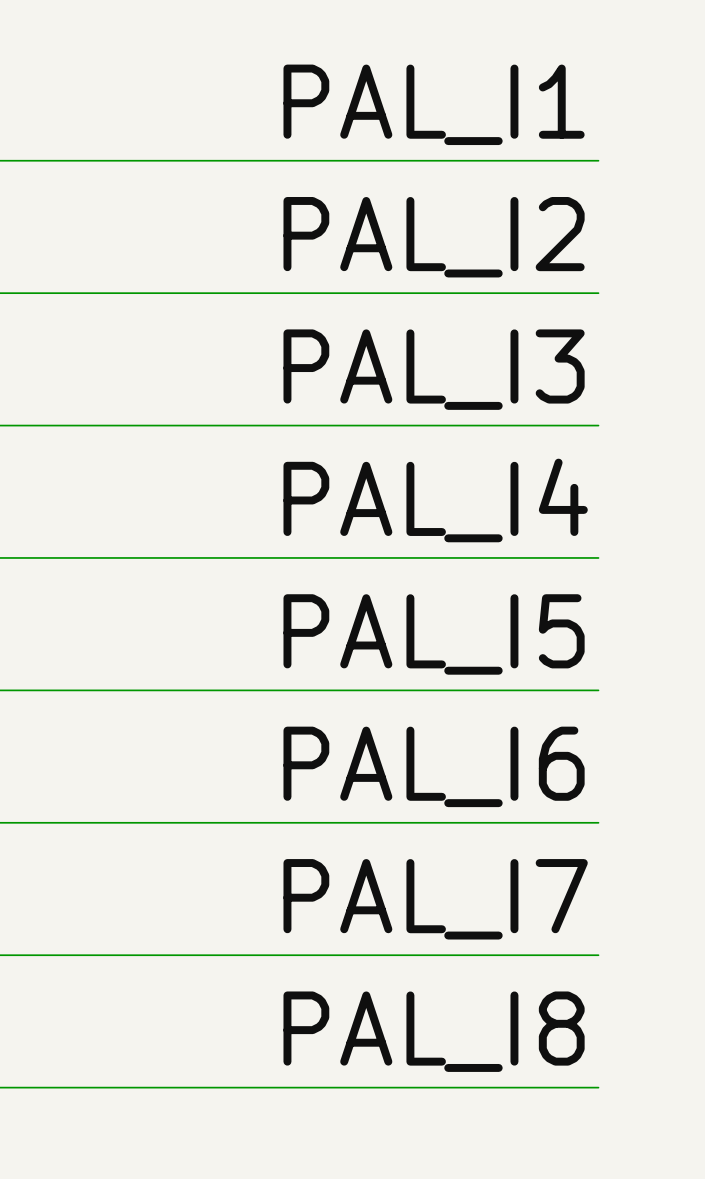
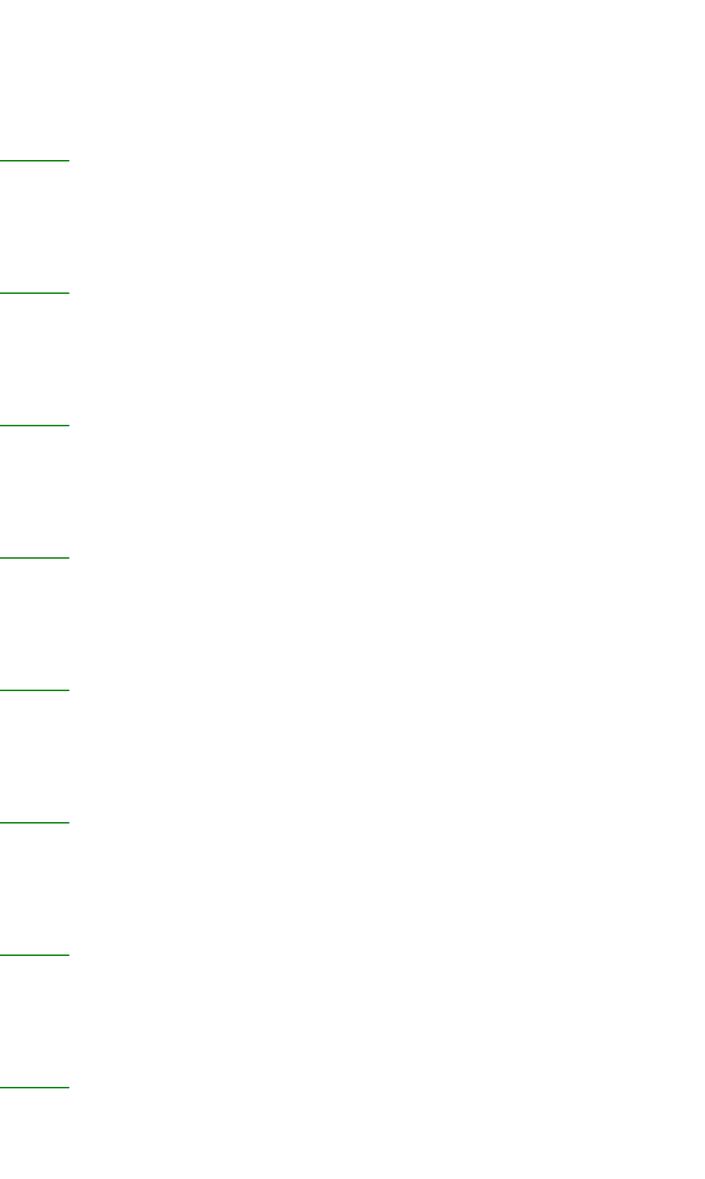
label: PAL_I1 (434, 104) -> none
wire: (68, 160) (598, 160) -> none
label: PAL_I2 (434, 237) -> none
wire: (68, 293) (598, 293) -> none
label: PAL_I3 (434, 369) -> none
wire: (68, 425) (598, 425) -> none
label: PAL_I4 (435, 500) -> none
wire: (68, 557) (598, 557) -> none
label: PAL_I5 (434, 634) -> none
wire: (68, 690) (598, 690) -> none
label: PAL_I6 (434, 766) -> none
wire: (68, 822) (598, 822) -> none
label: PAL_I7 (435, 899) -> none
wire: (68, 955) (598, 955) -> none
label: PAL_I8 (434, 1031) -> none
wire: (68, 1087) (598, 1087) -> none

